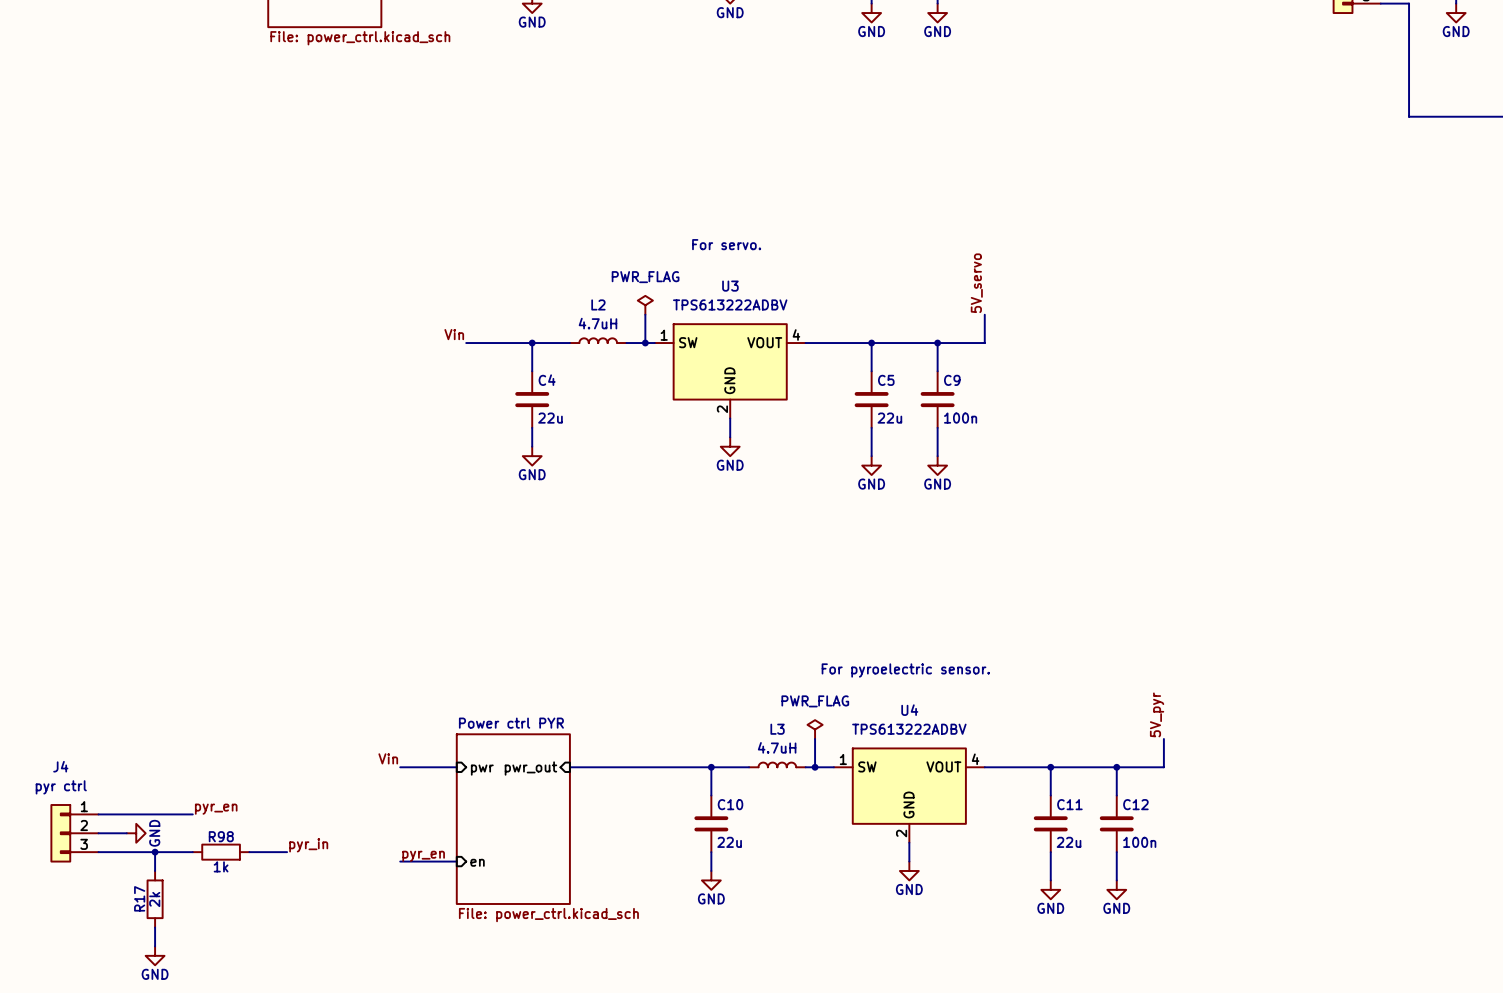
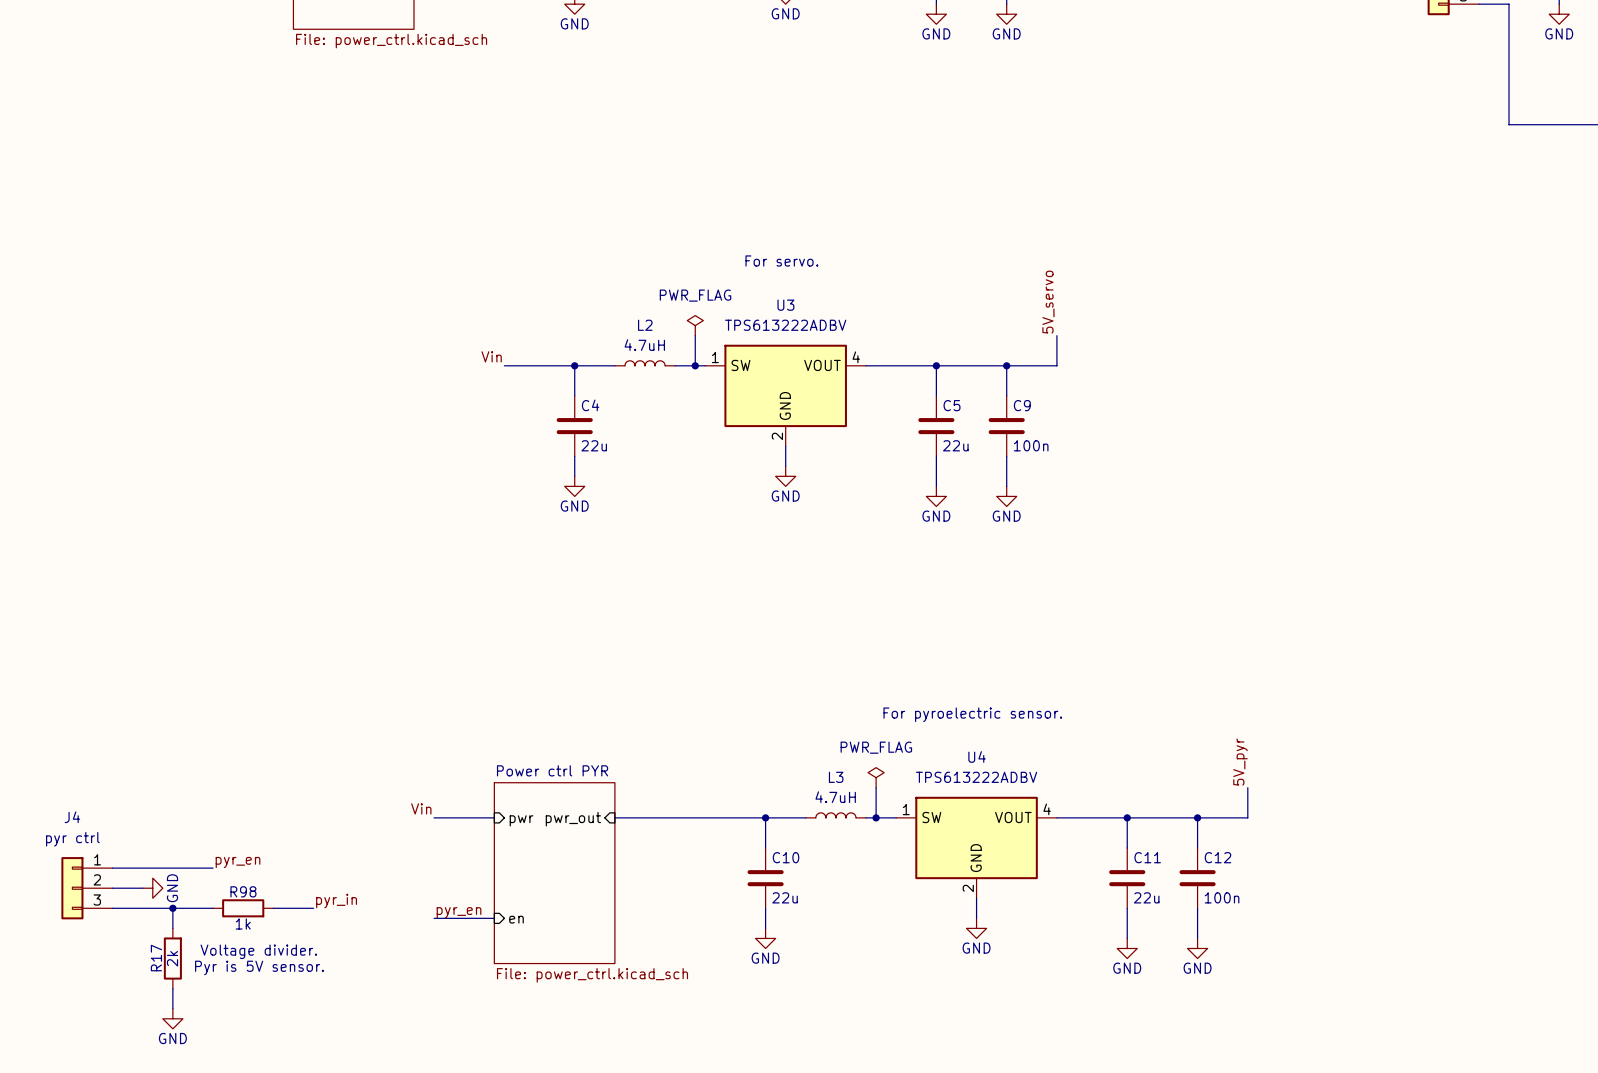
text: none -> Voltage divider. (258, 951)
text: none -> Pyr is 5V sensor. (259, 967)

